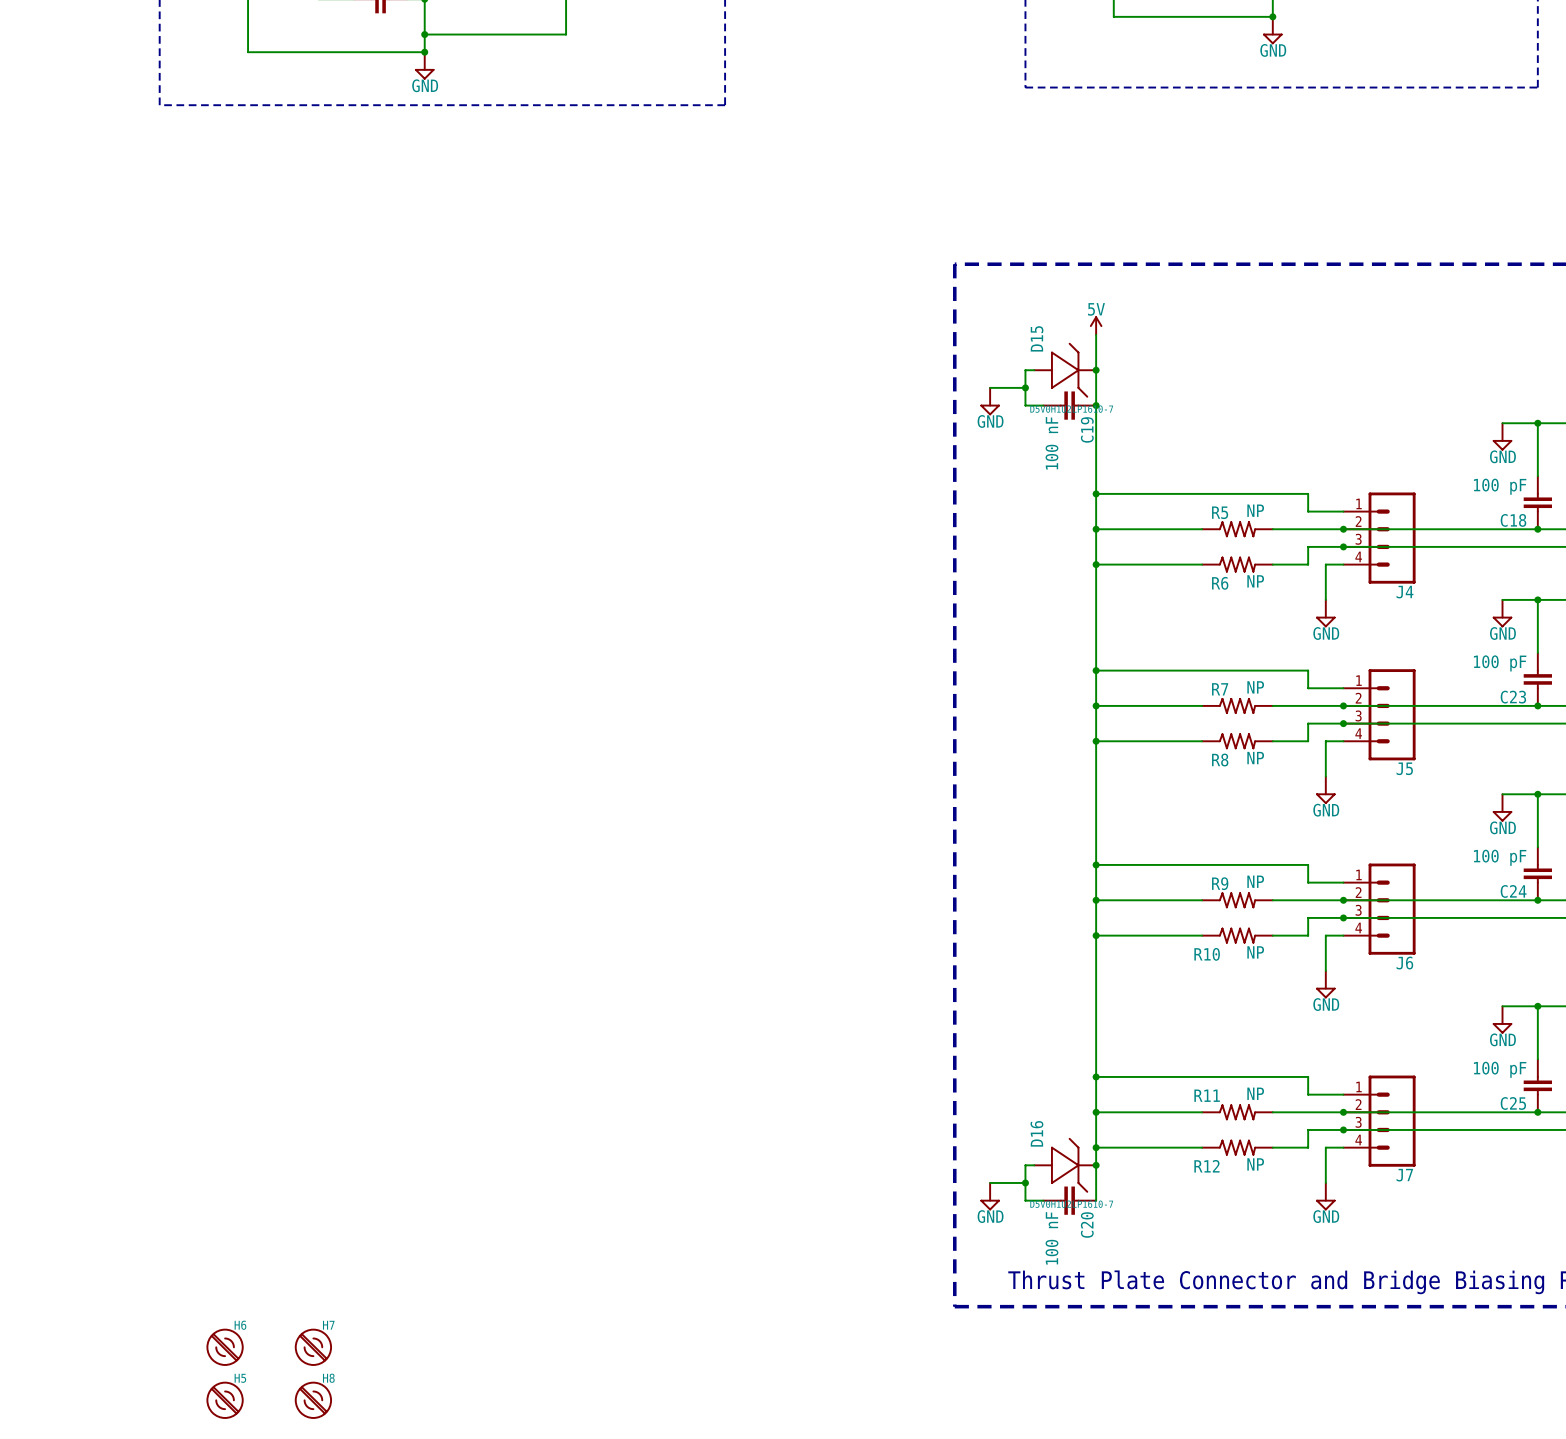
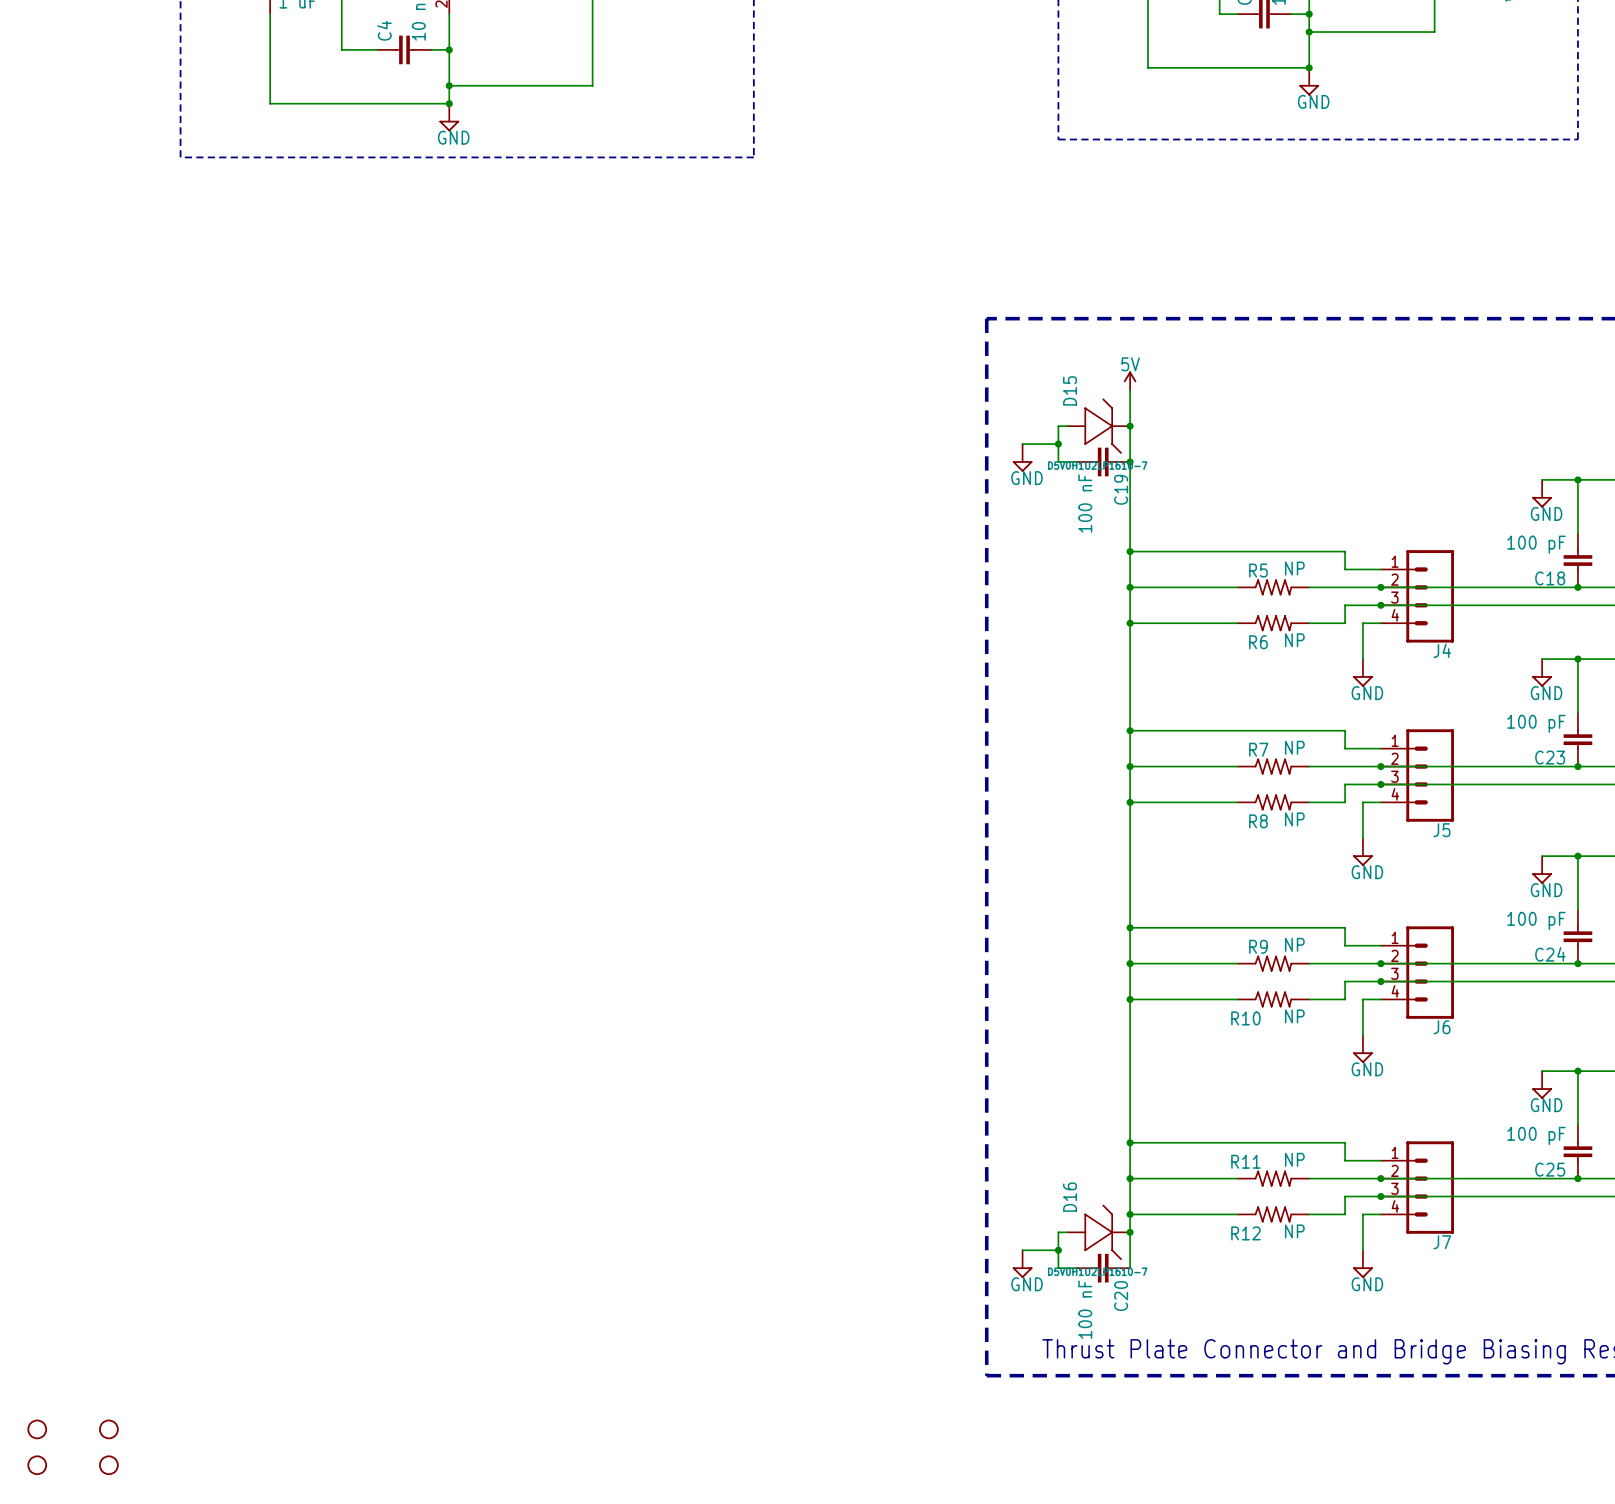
H6: (225, 1347) -> none
H7: (313, 1347) -> none
part: none -> (37, 1429)
part: none -> (108, 1429)
part: none -> (37, 1465)
part: none -> (108, 1465)
H5: (225, 1400) -> none
H8: (313, 1400) -> none

